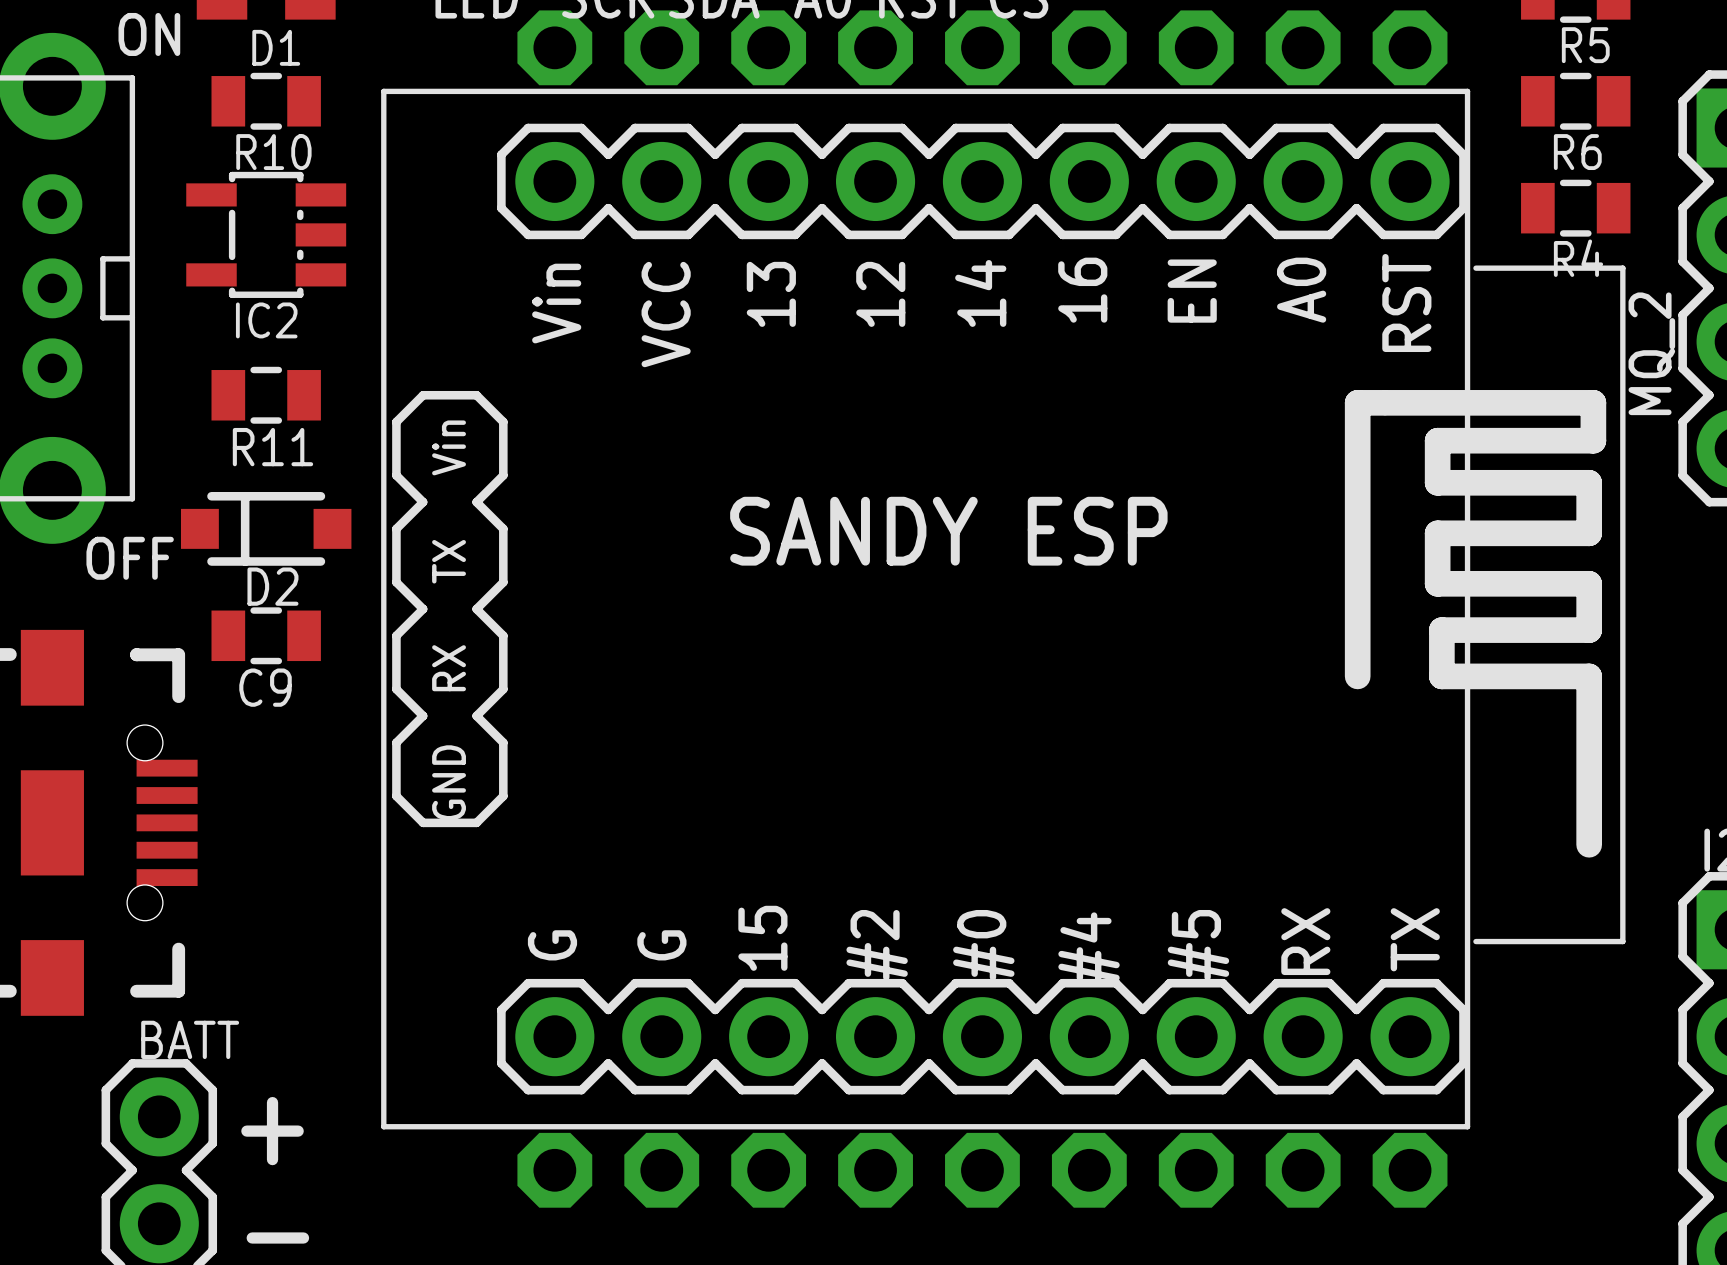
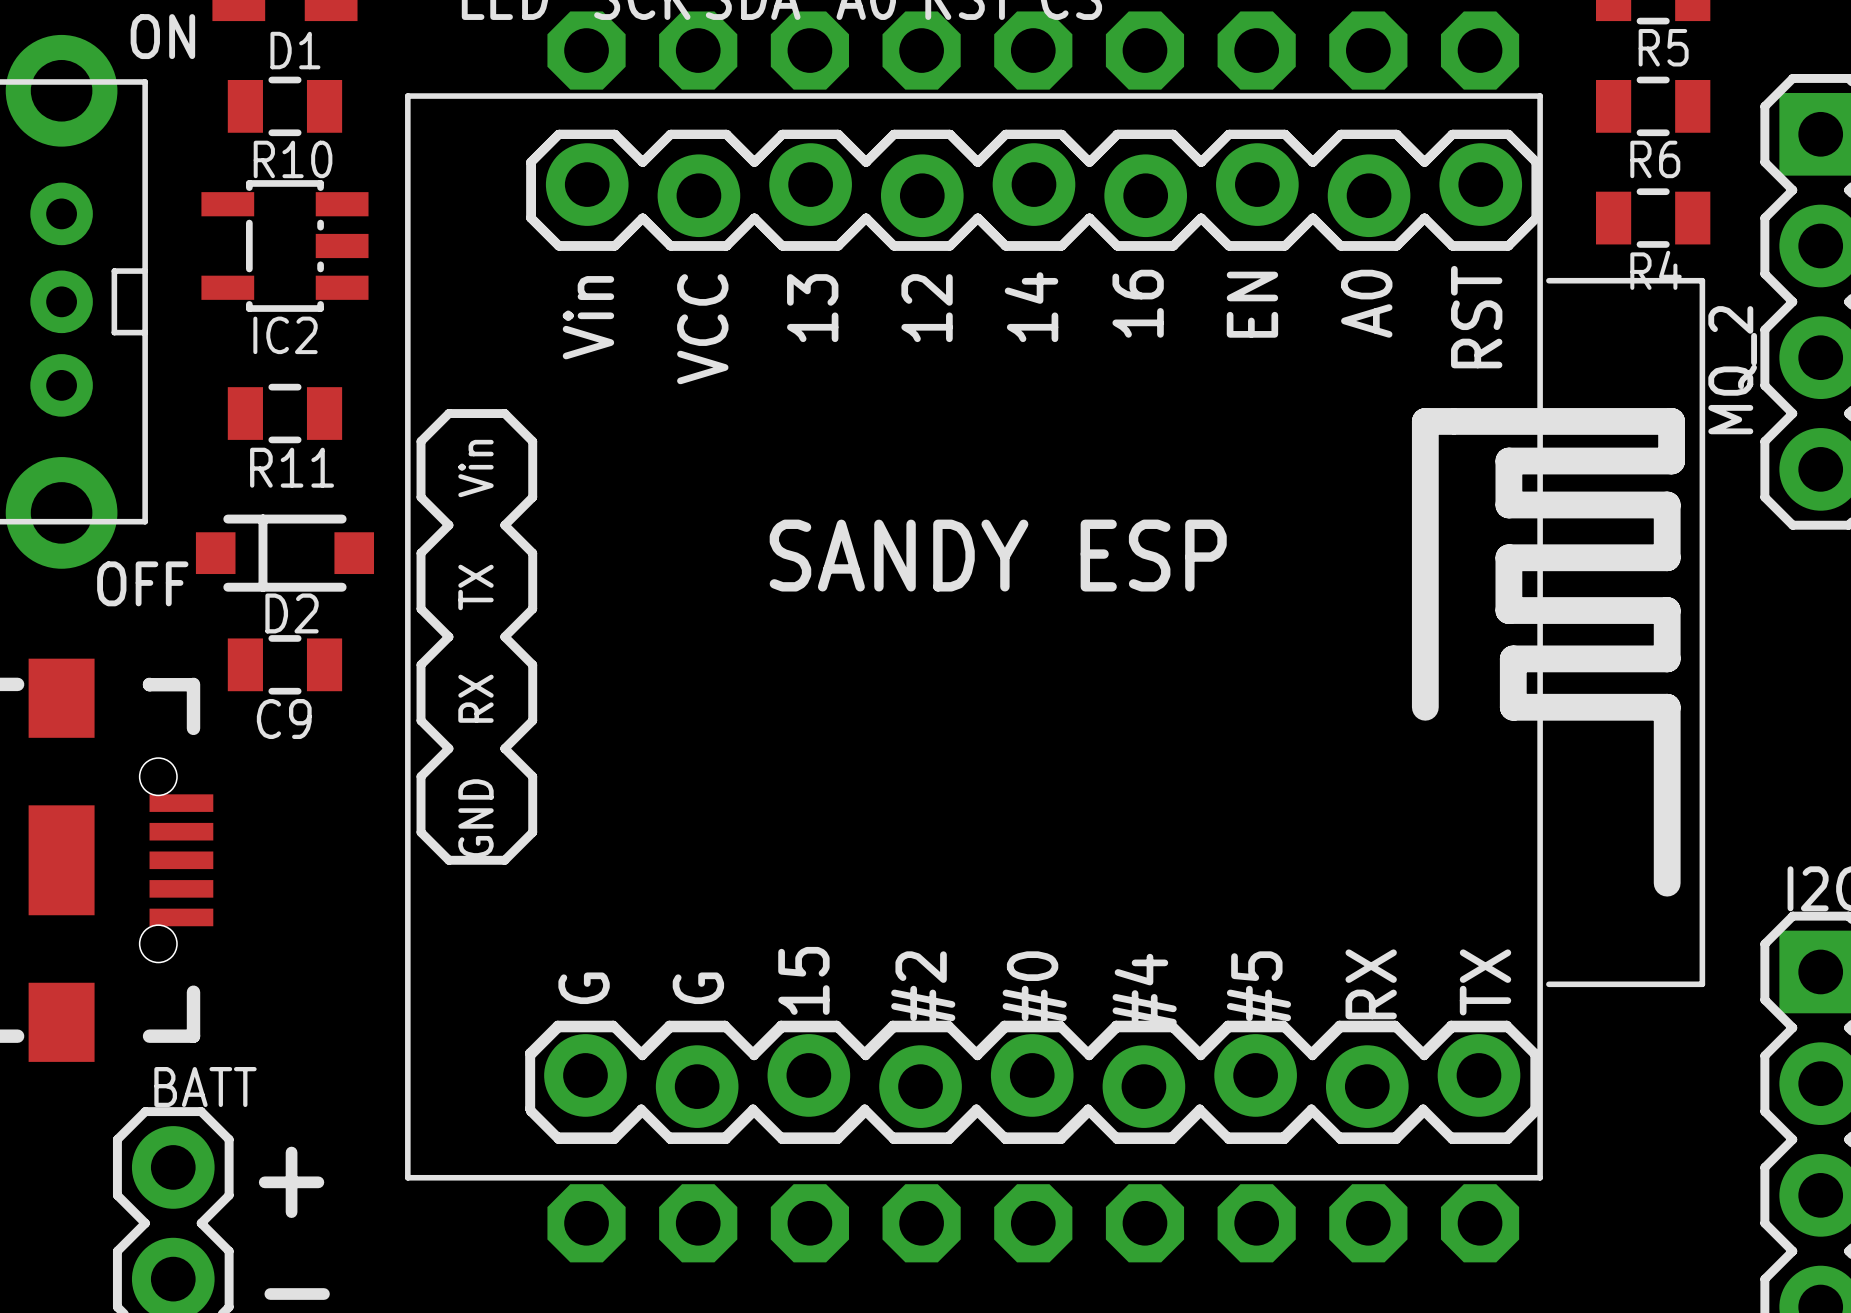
part footprint: [381, 88, 1626, 1130] -> [405, 93, 1706, 1181]

